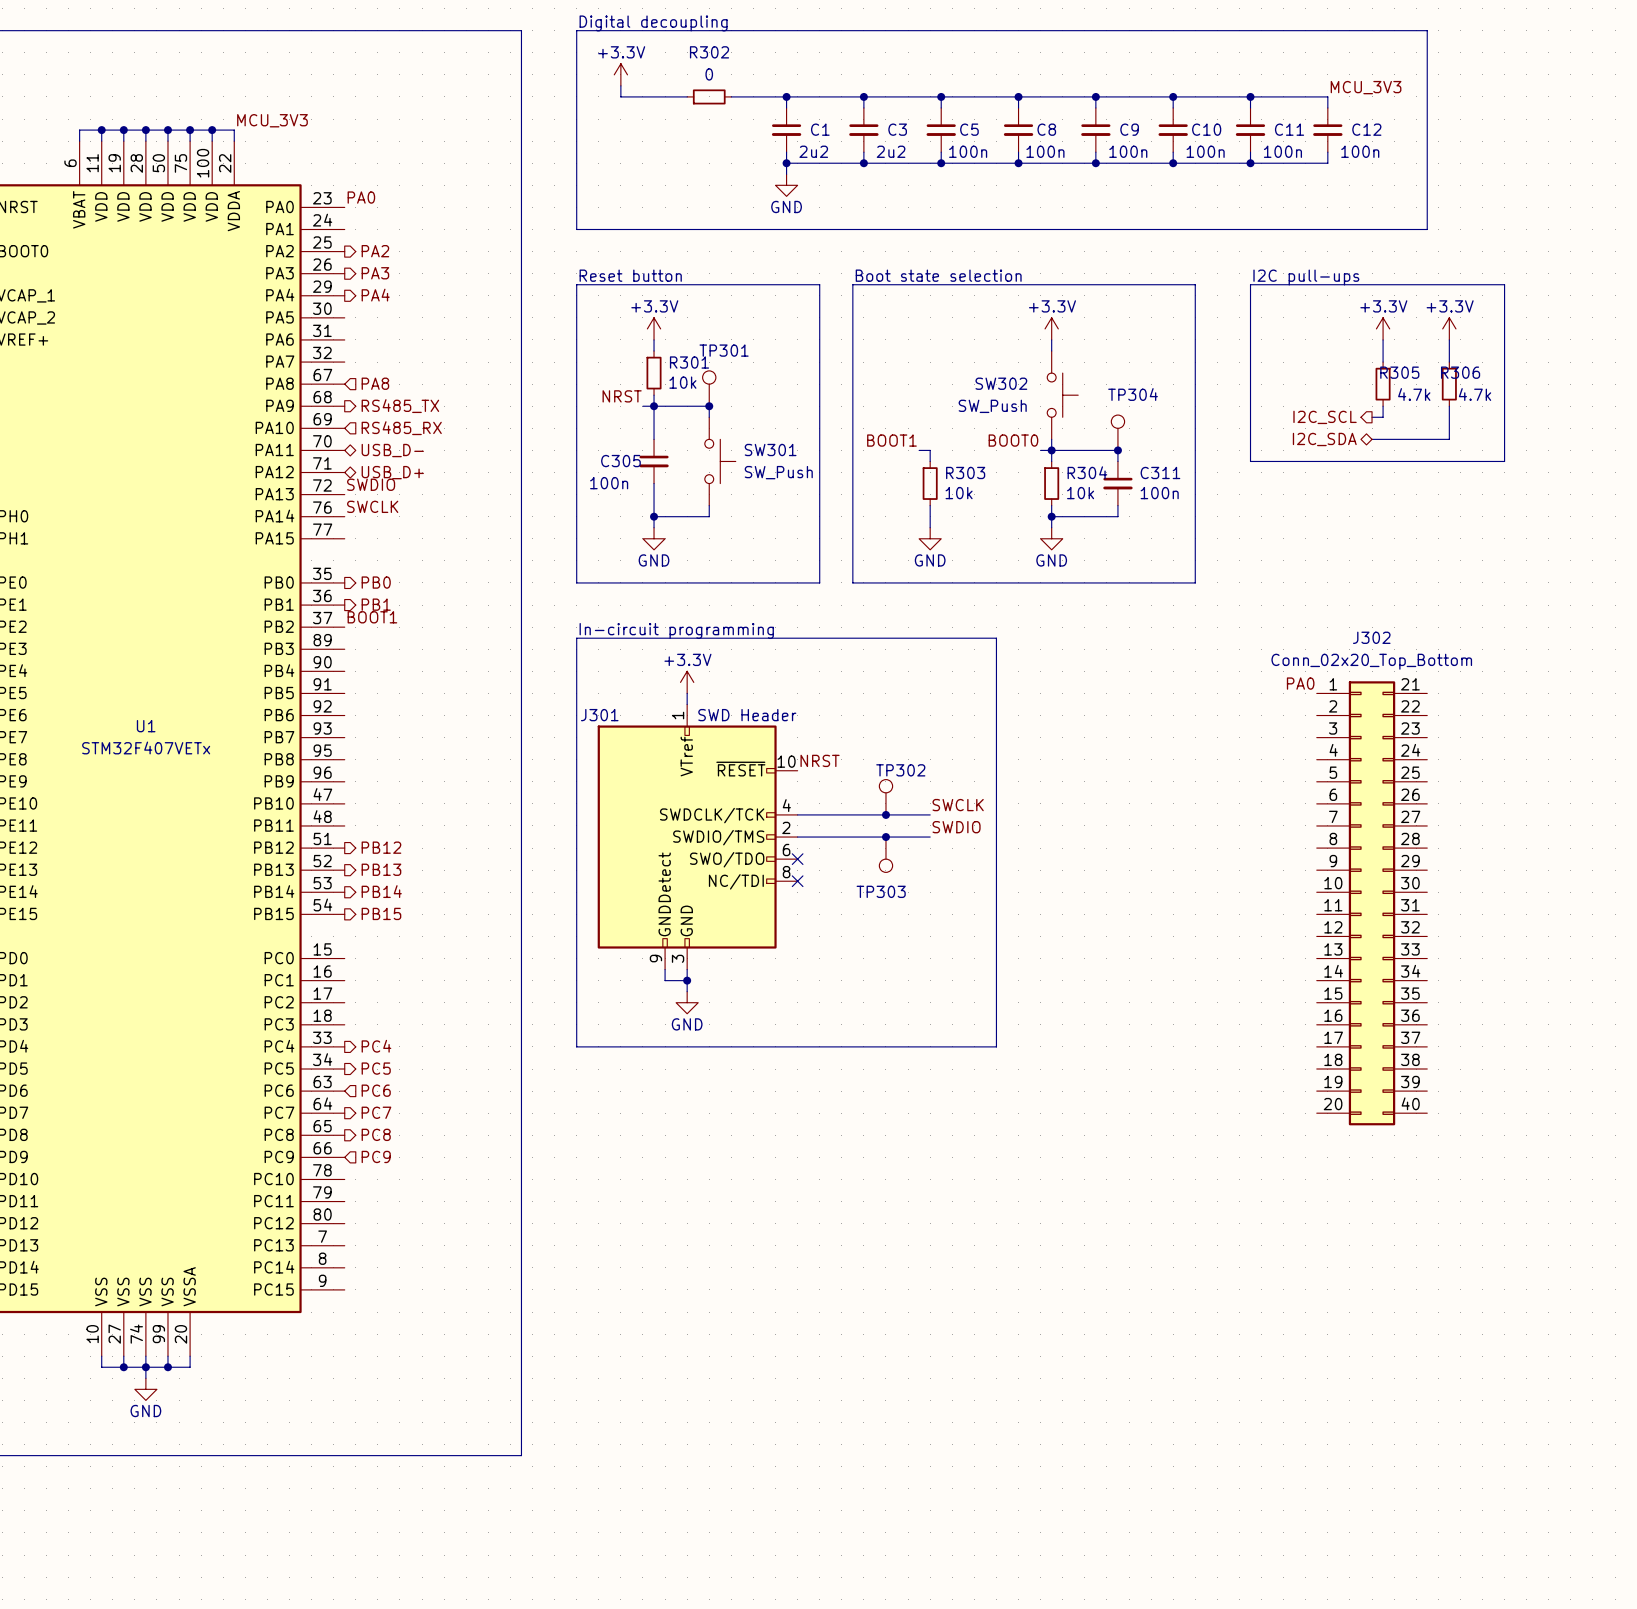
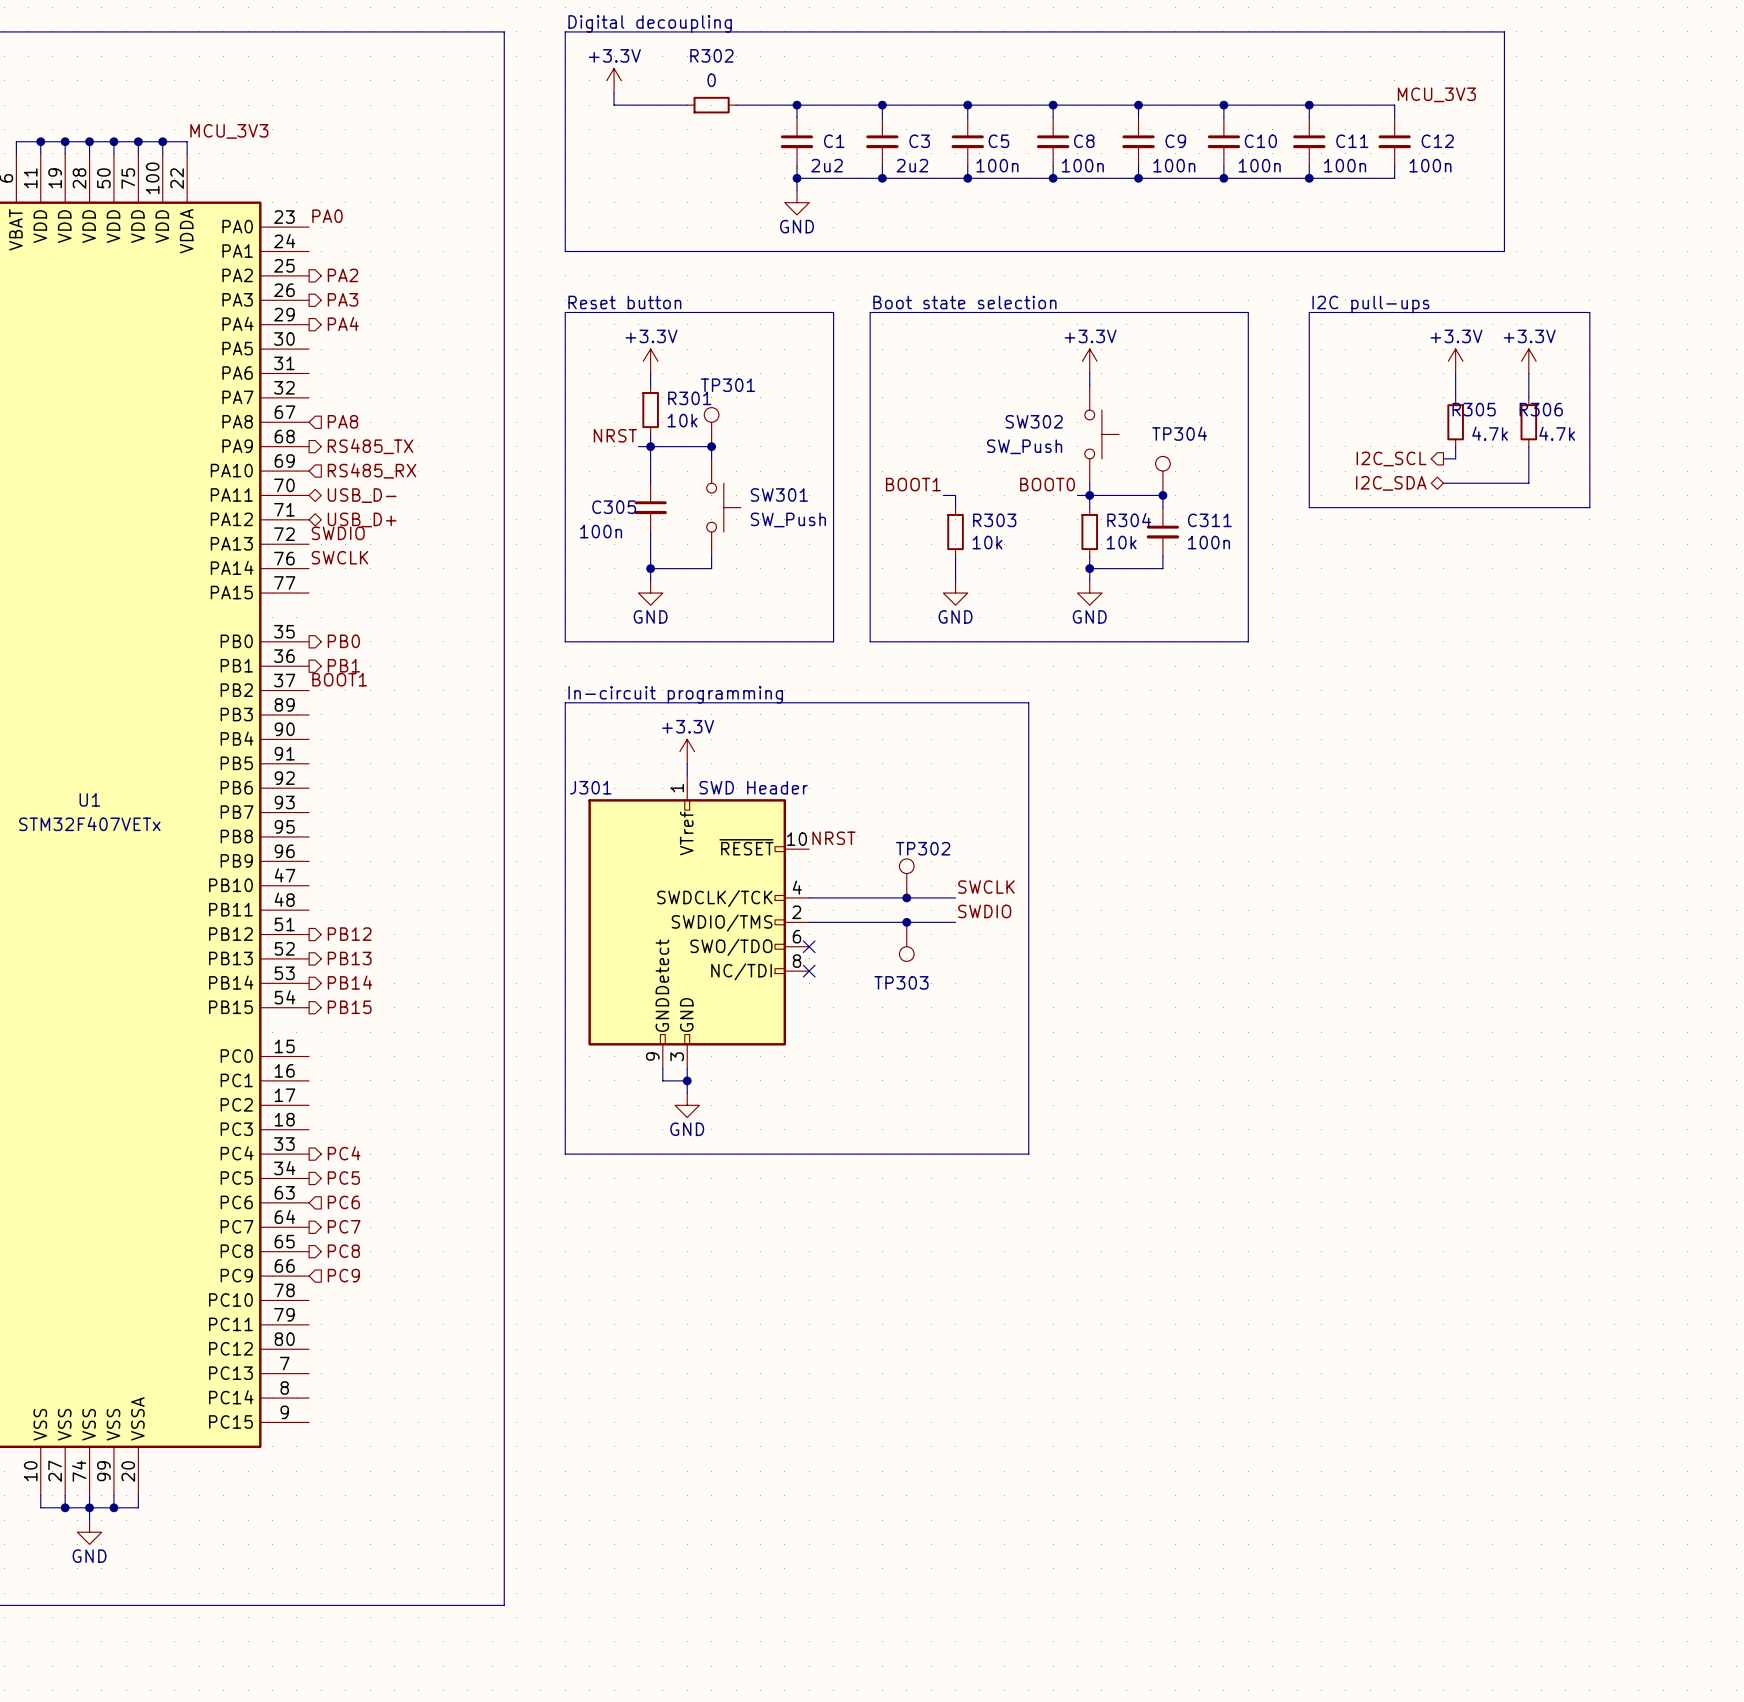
label: PA0 (1300, 683) -> none
J302: Conn_02x20_Top_Bottom (1372, 903) -> none

